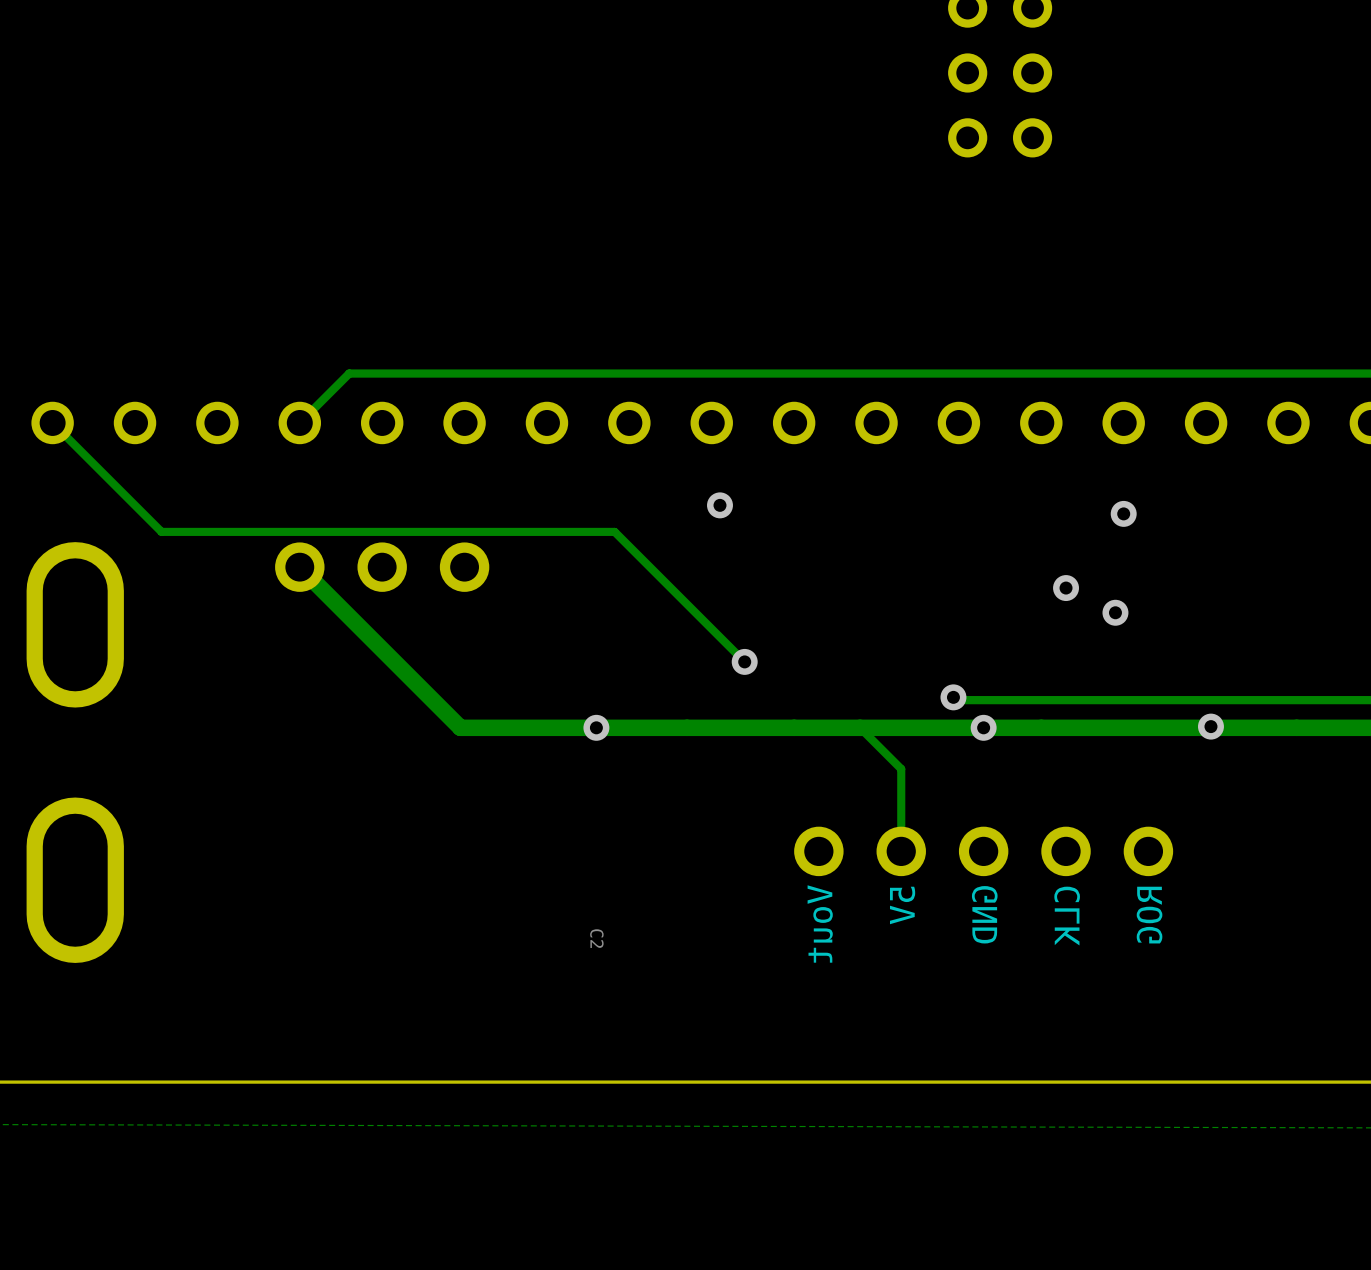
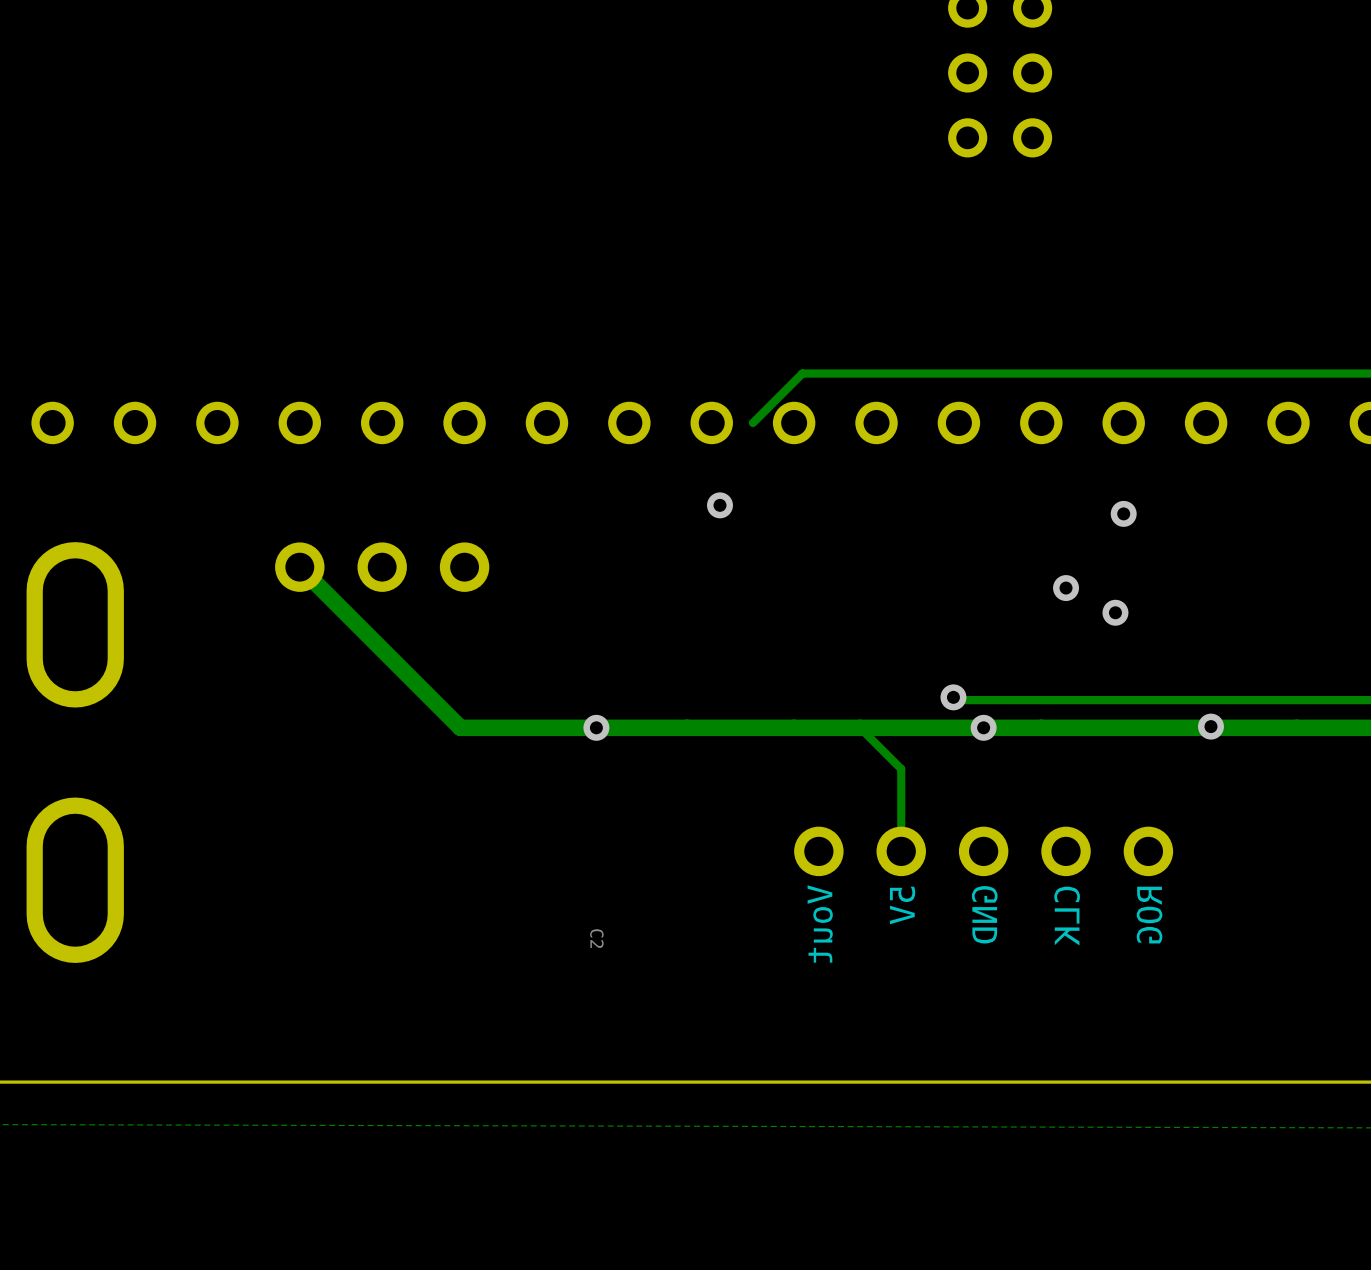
track: (802, 373) (349, 373) (299, 422) -> (802, 373) (752, 422)
track: (52, 422) (161, 531) (614, 531) (744, 661) -> none
via: (744, 661) -> none

